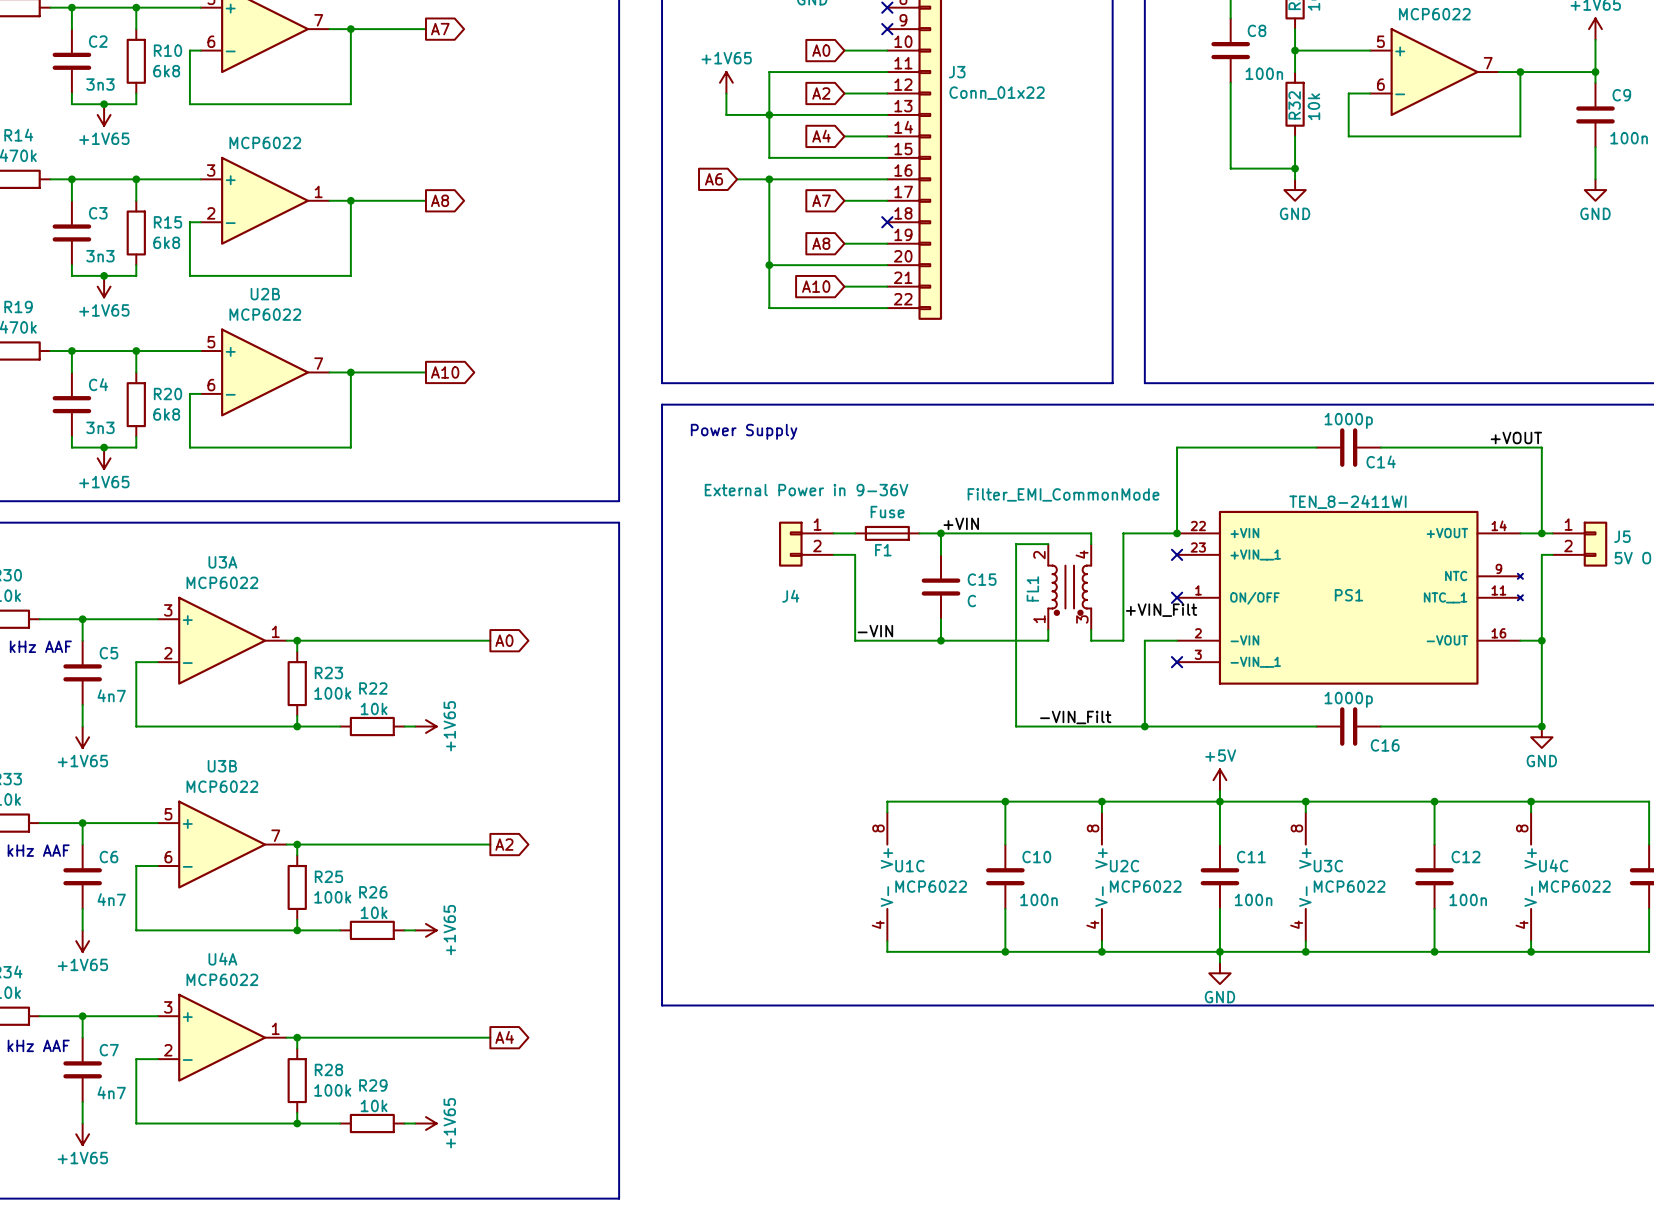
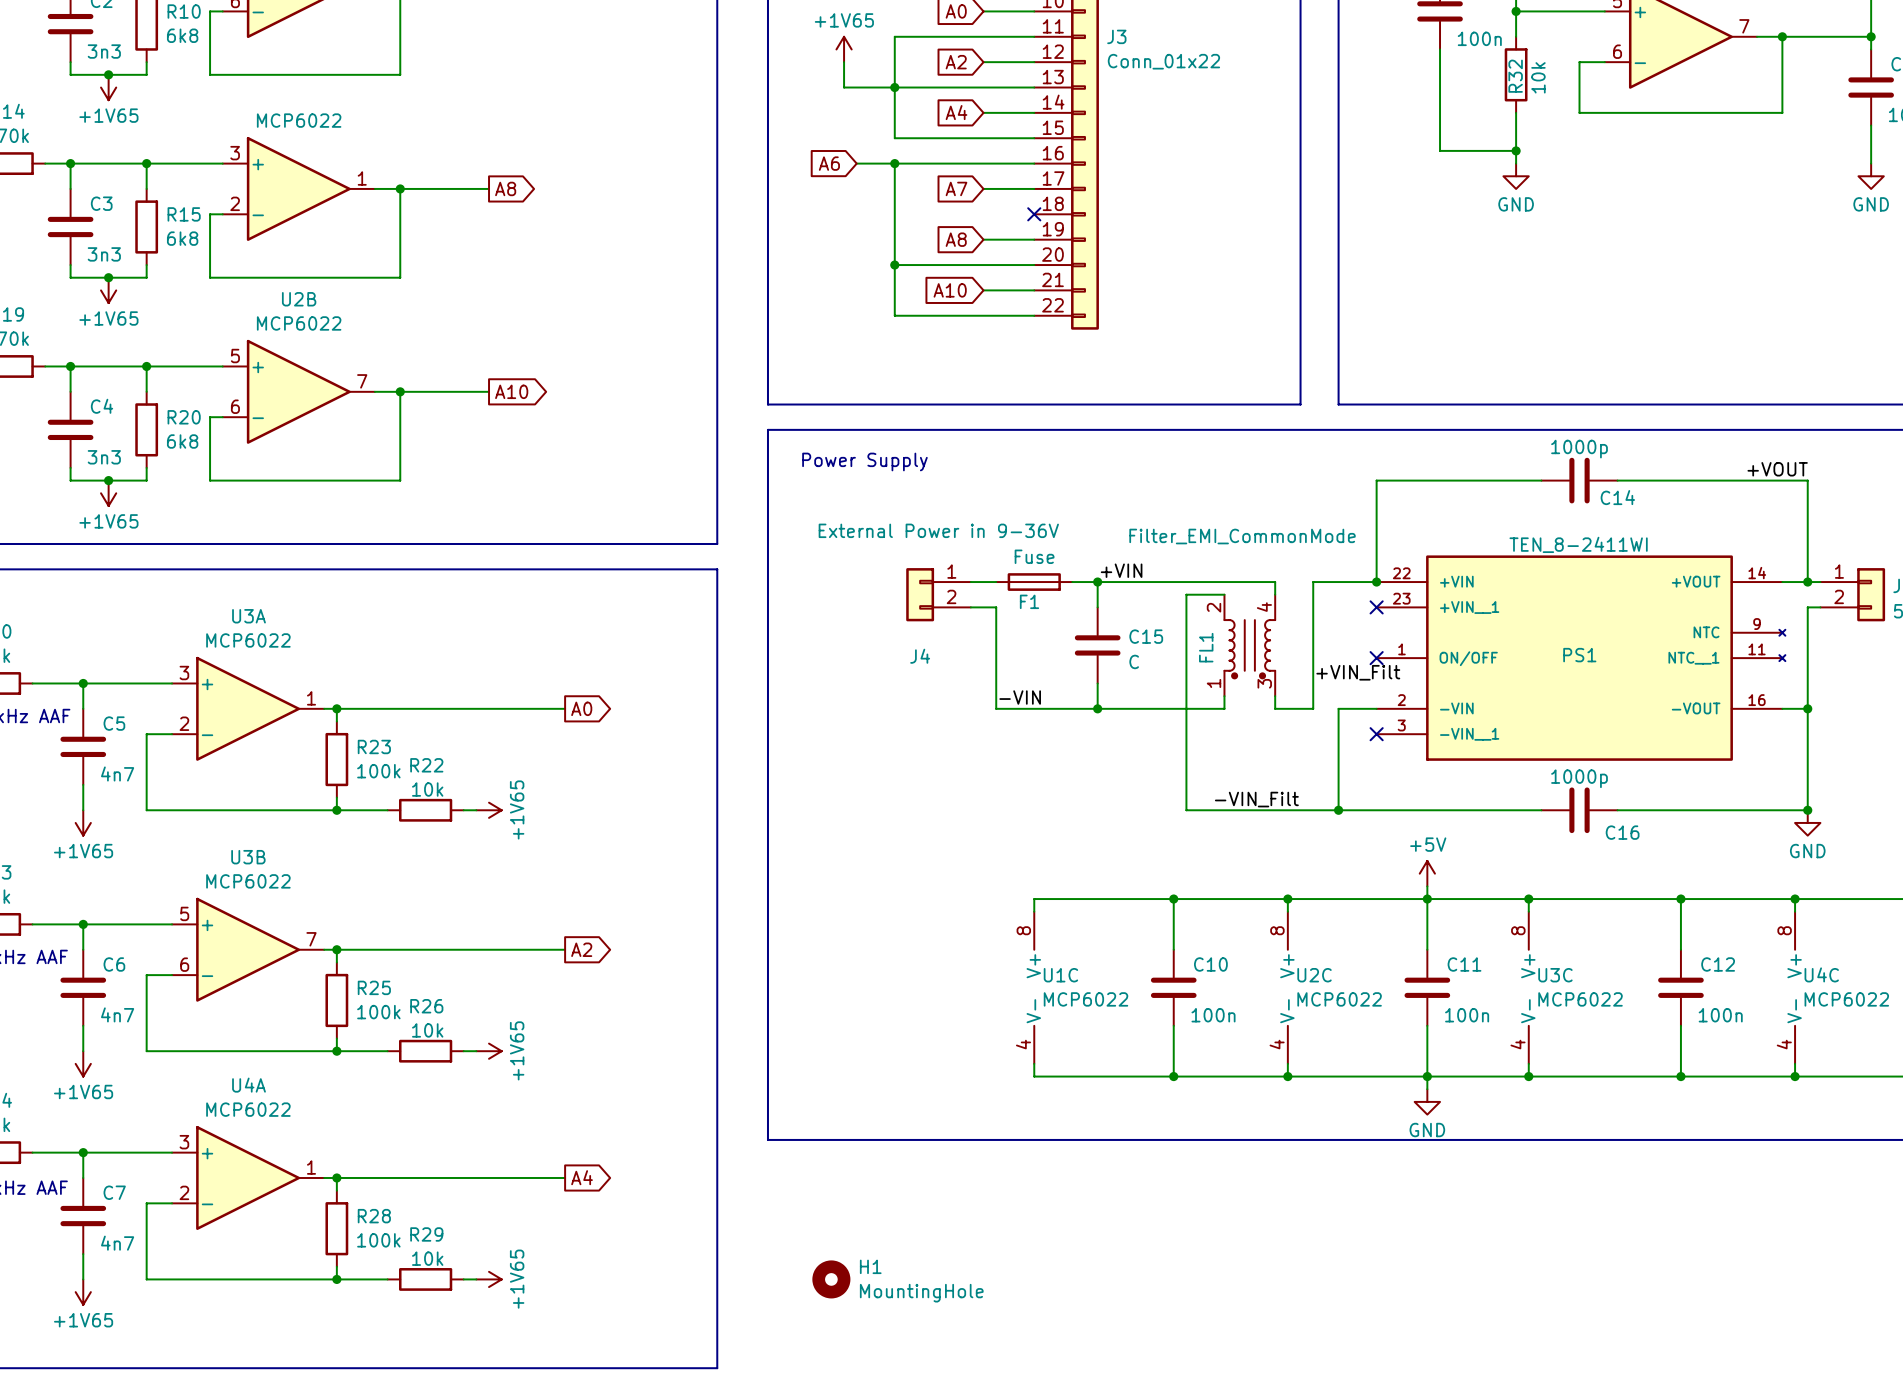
H1: none -> MountingHole (831, 1279)

